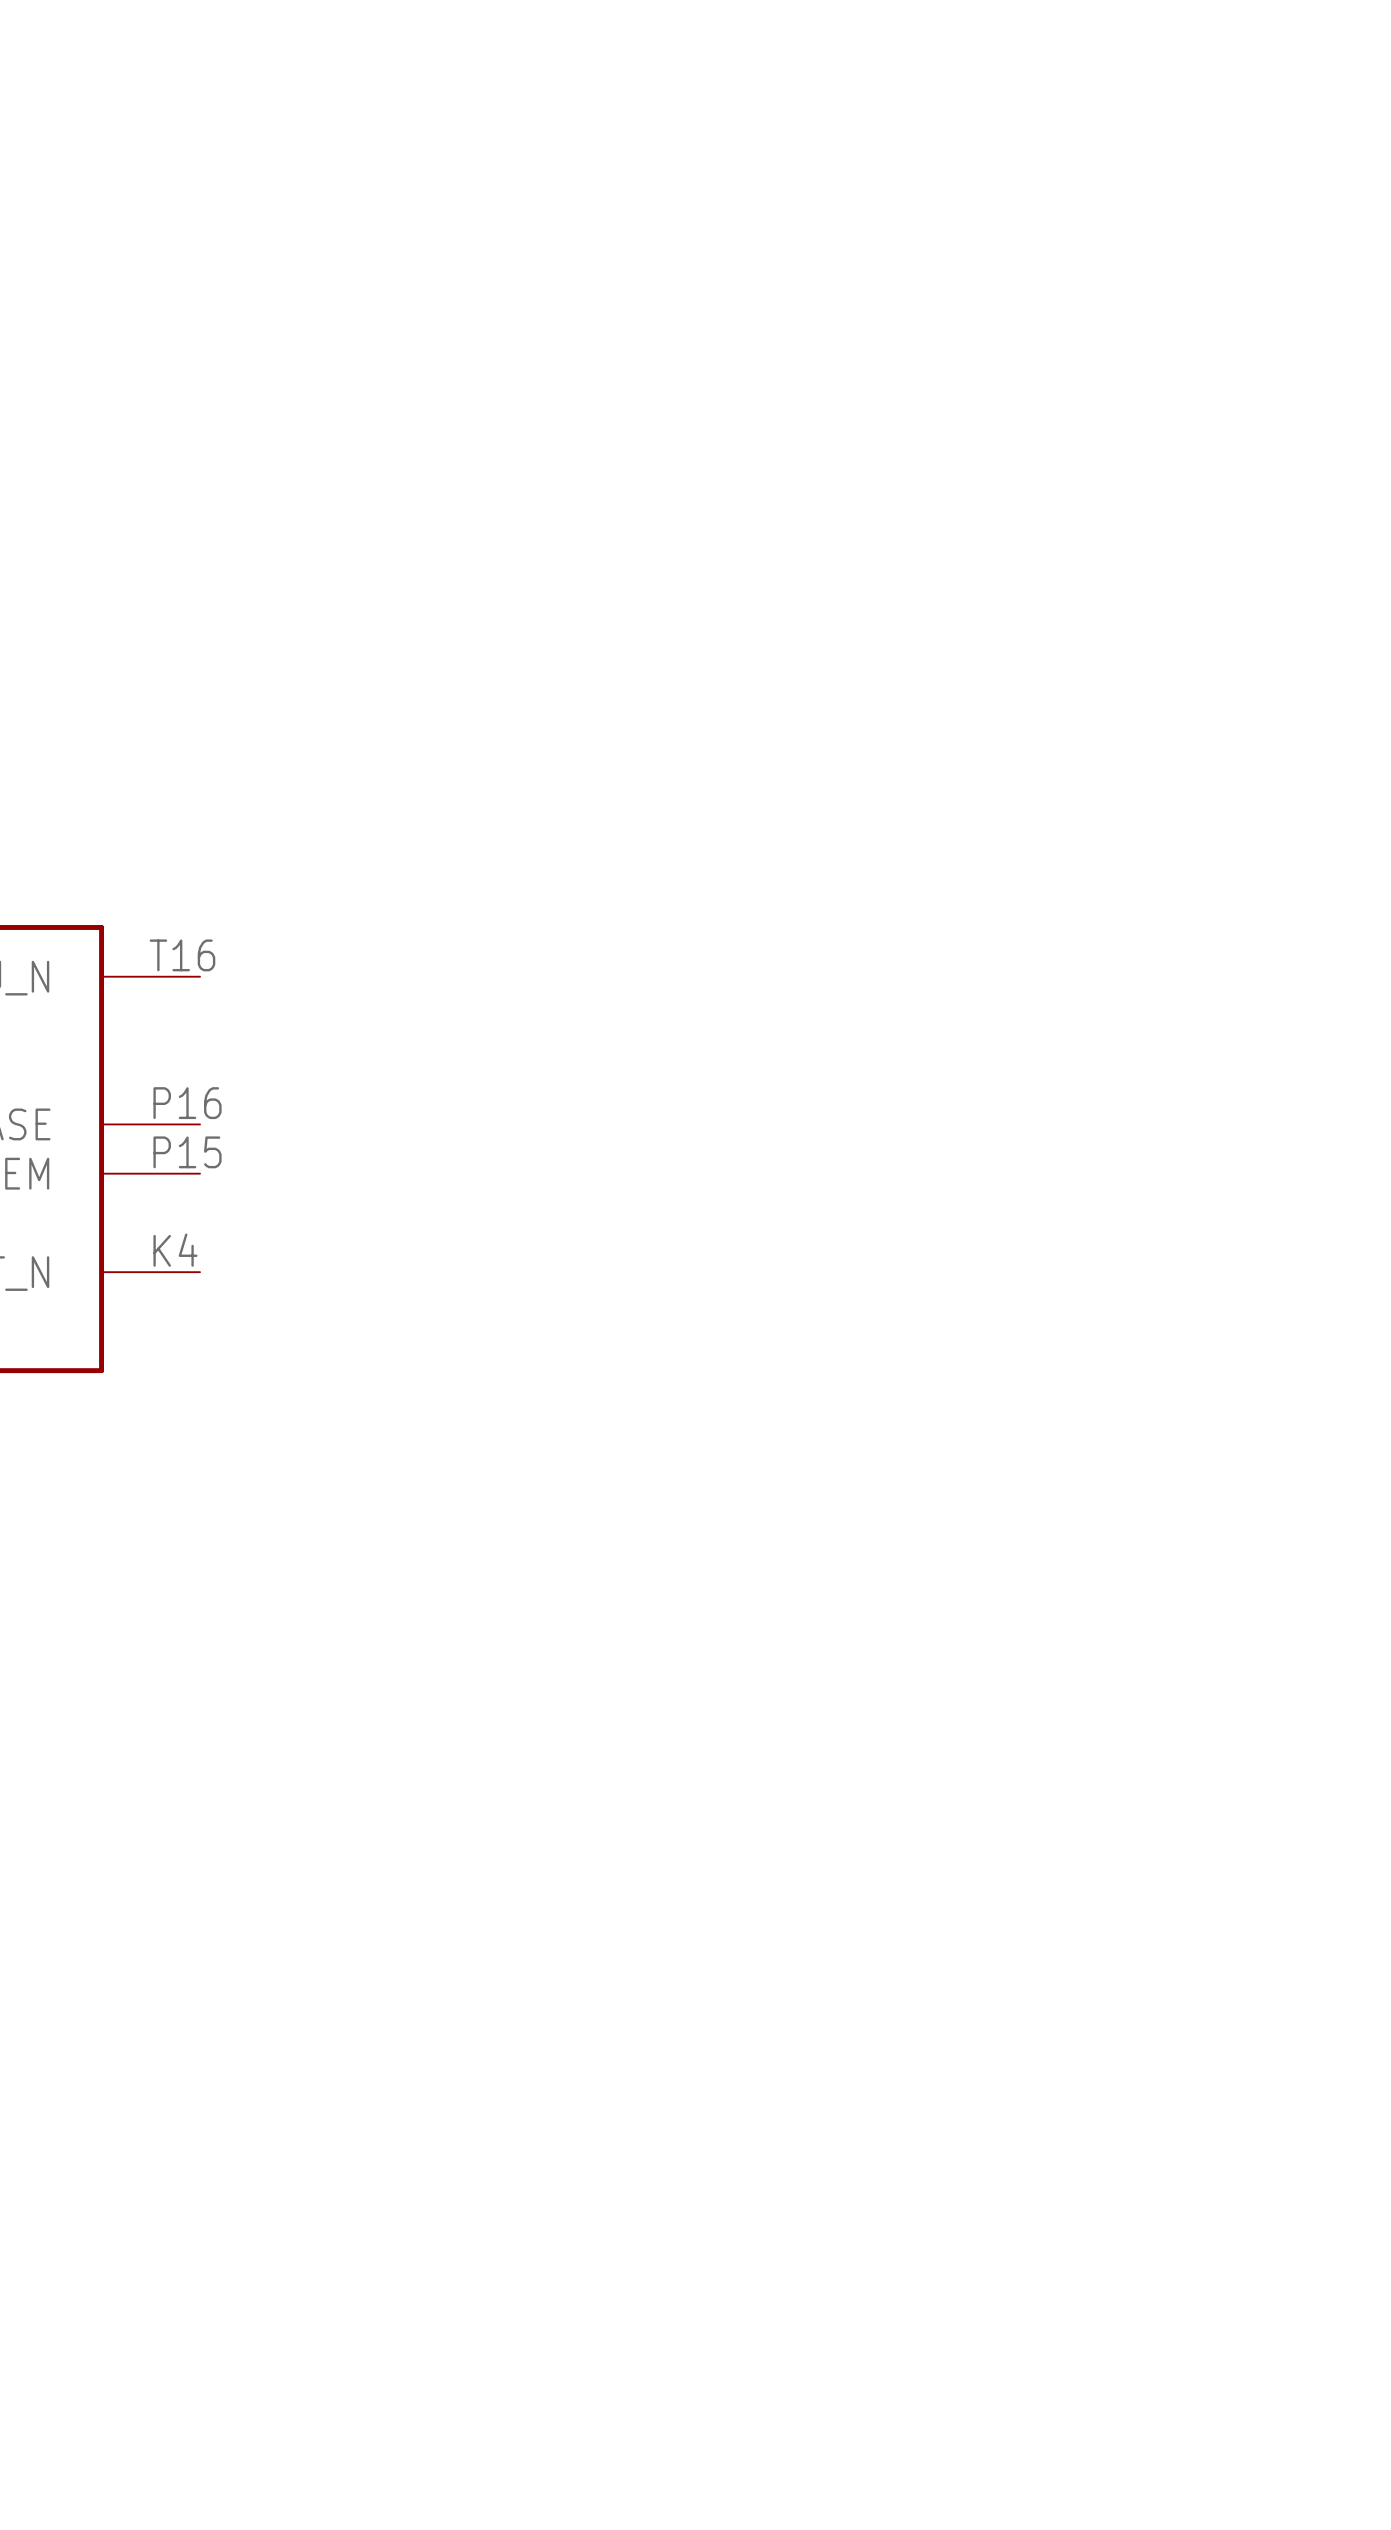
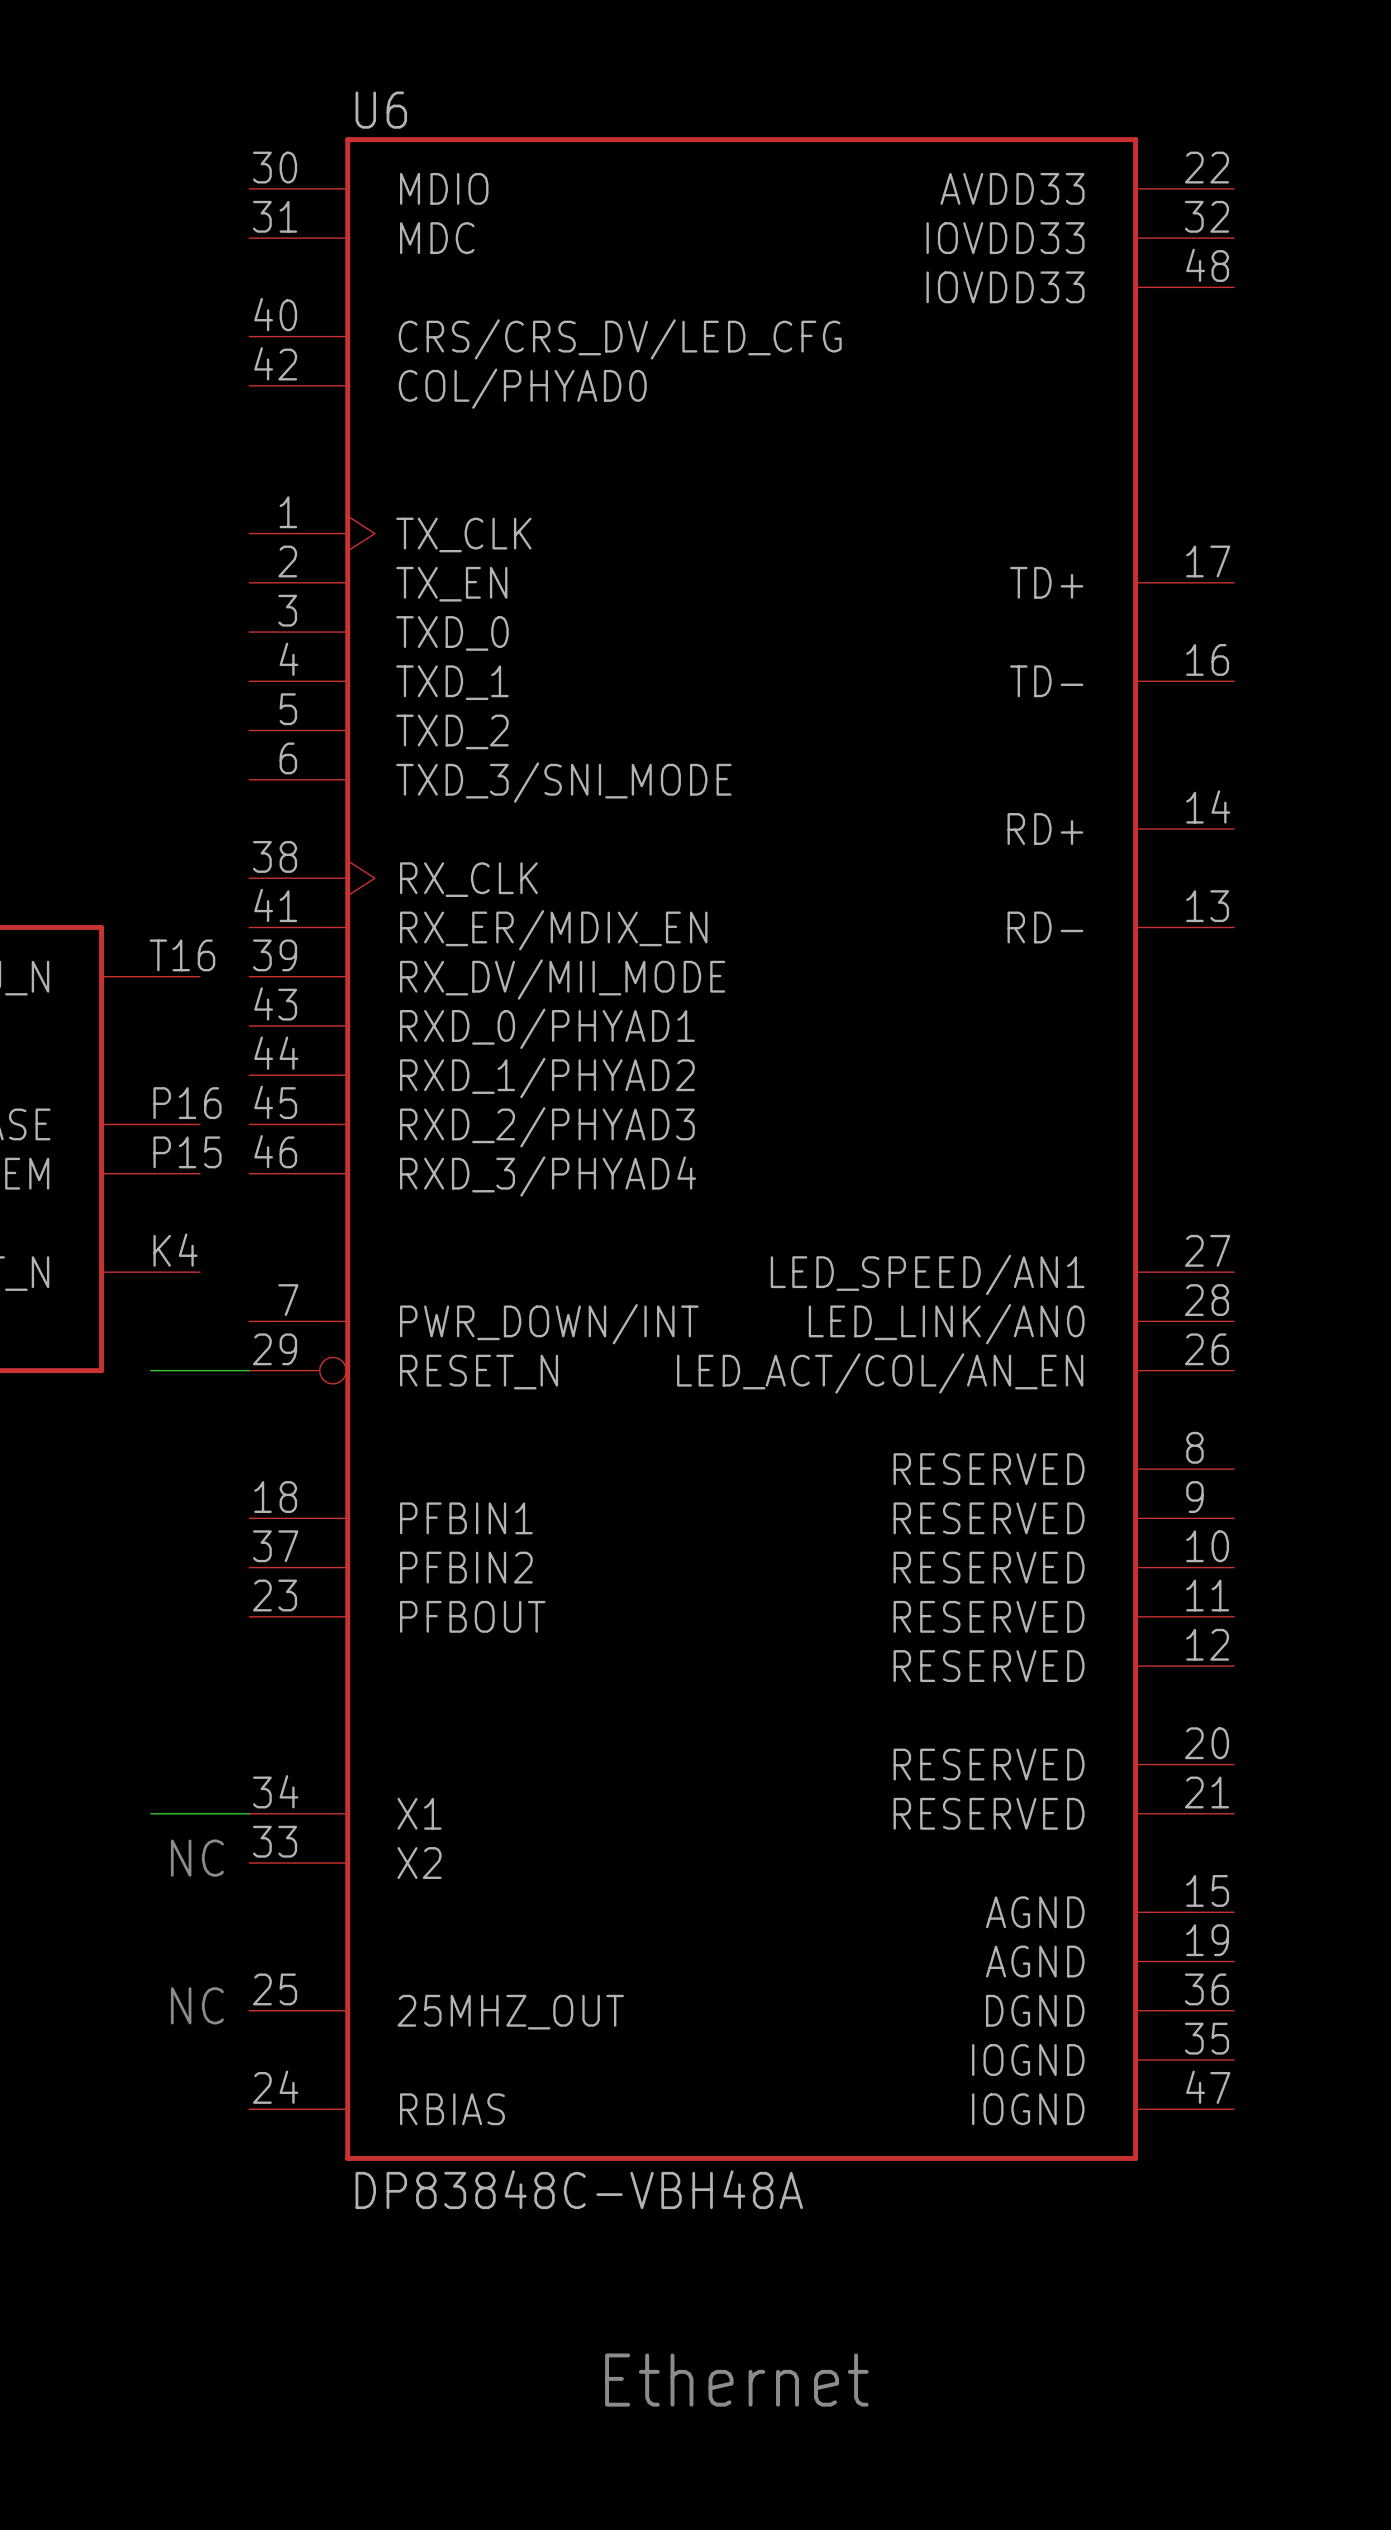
U6: none -> DP83848C-VBH48A (741, 1149)
wire: none -> (150, 1370) (249, 1370)
wire: none -> (150, 1813) (249, 1813)
text: none -> NC (197, 1858)
text: none -> NC (197, 2005)
text: none -> Ethernet (736, 2380)

